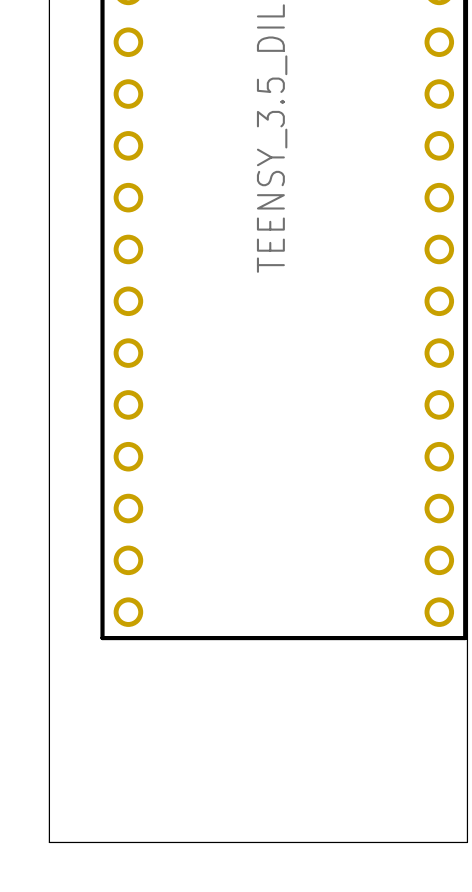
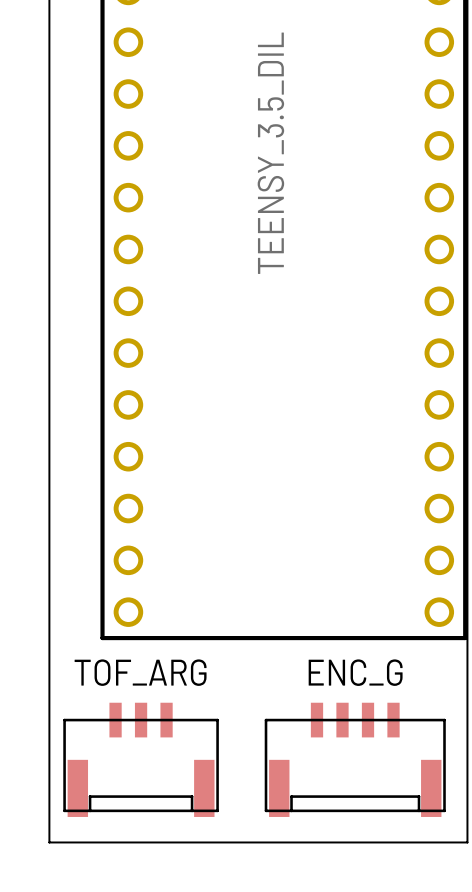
TOF_ARG: none -> (141, 759)
ENC_G: none -> (355, 759)

